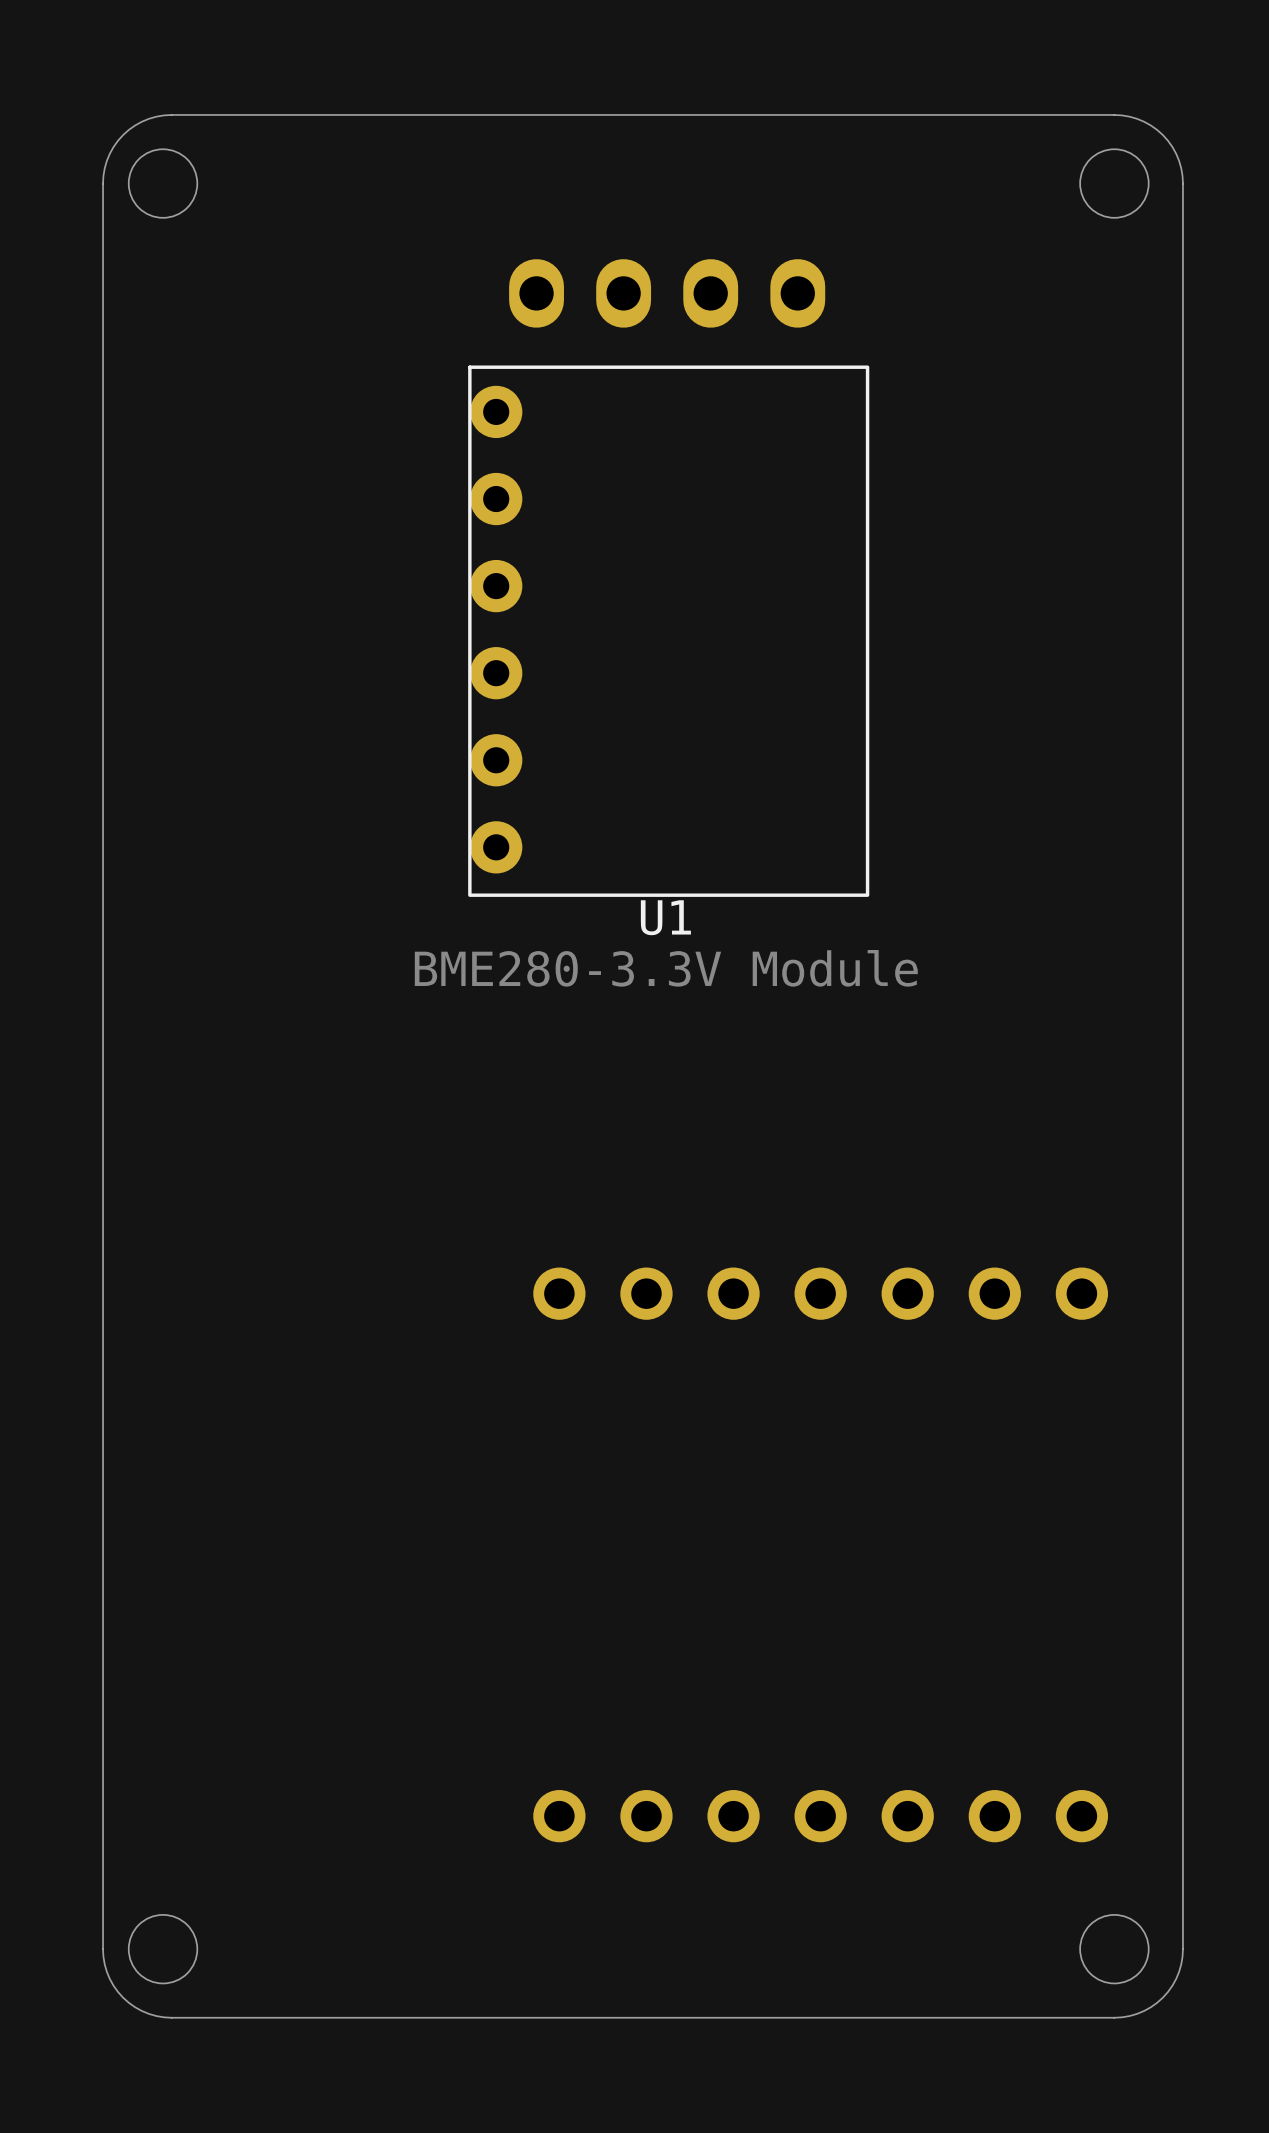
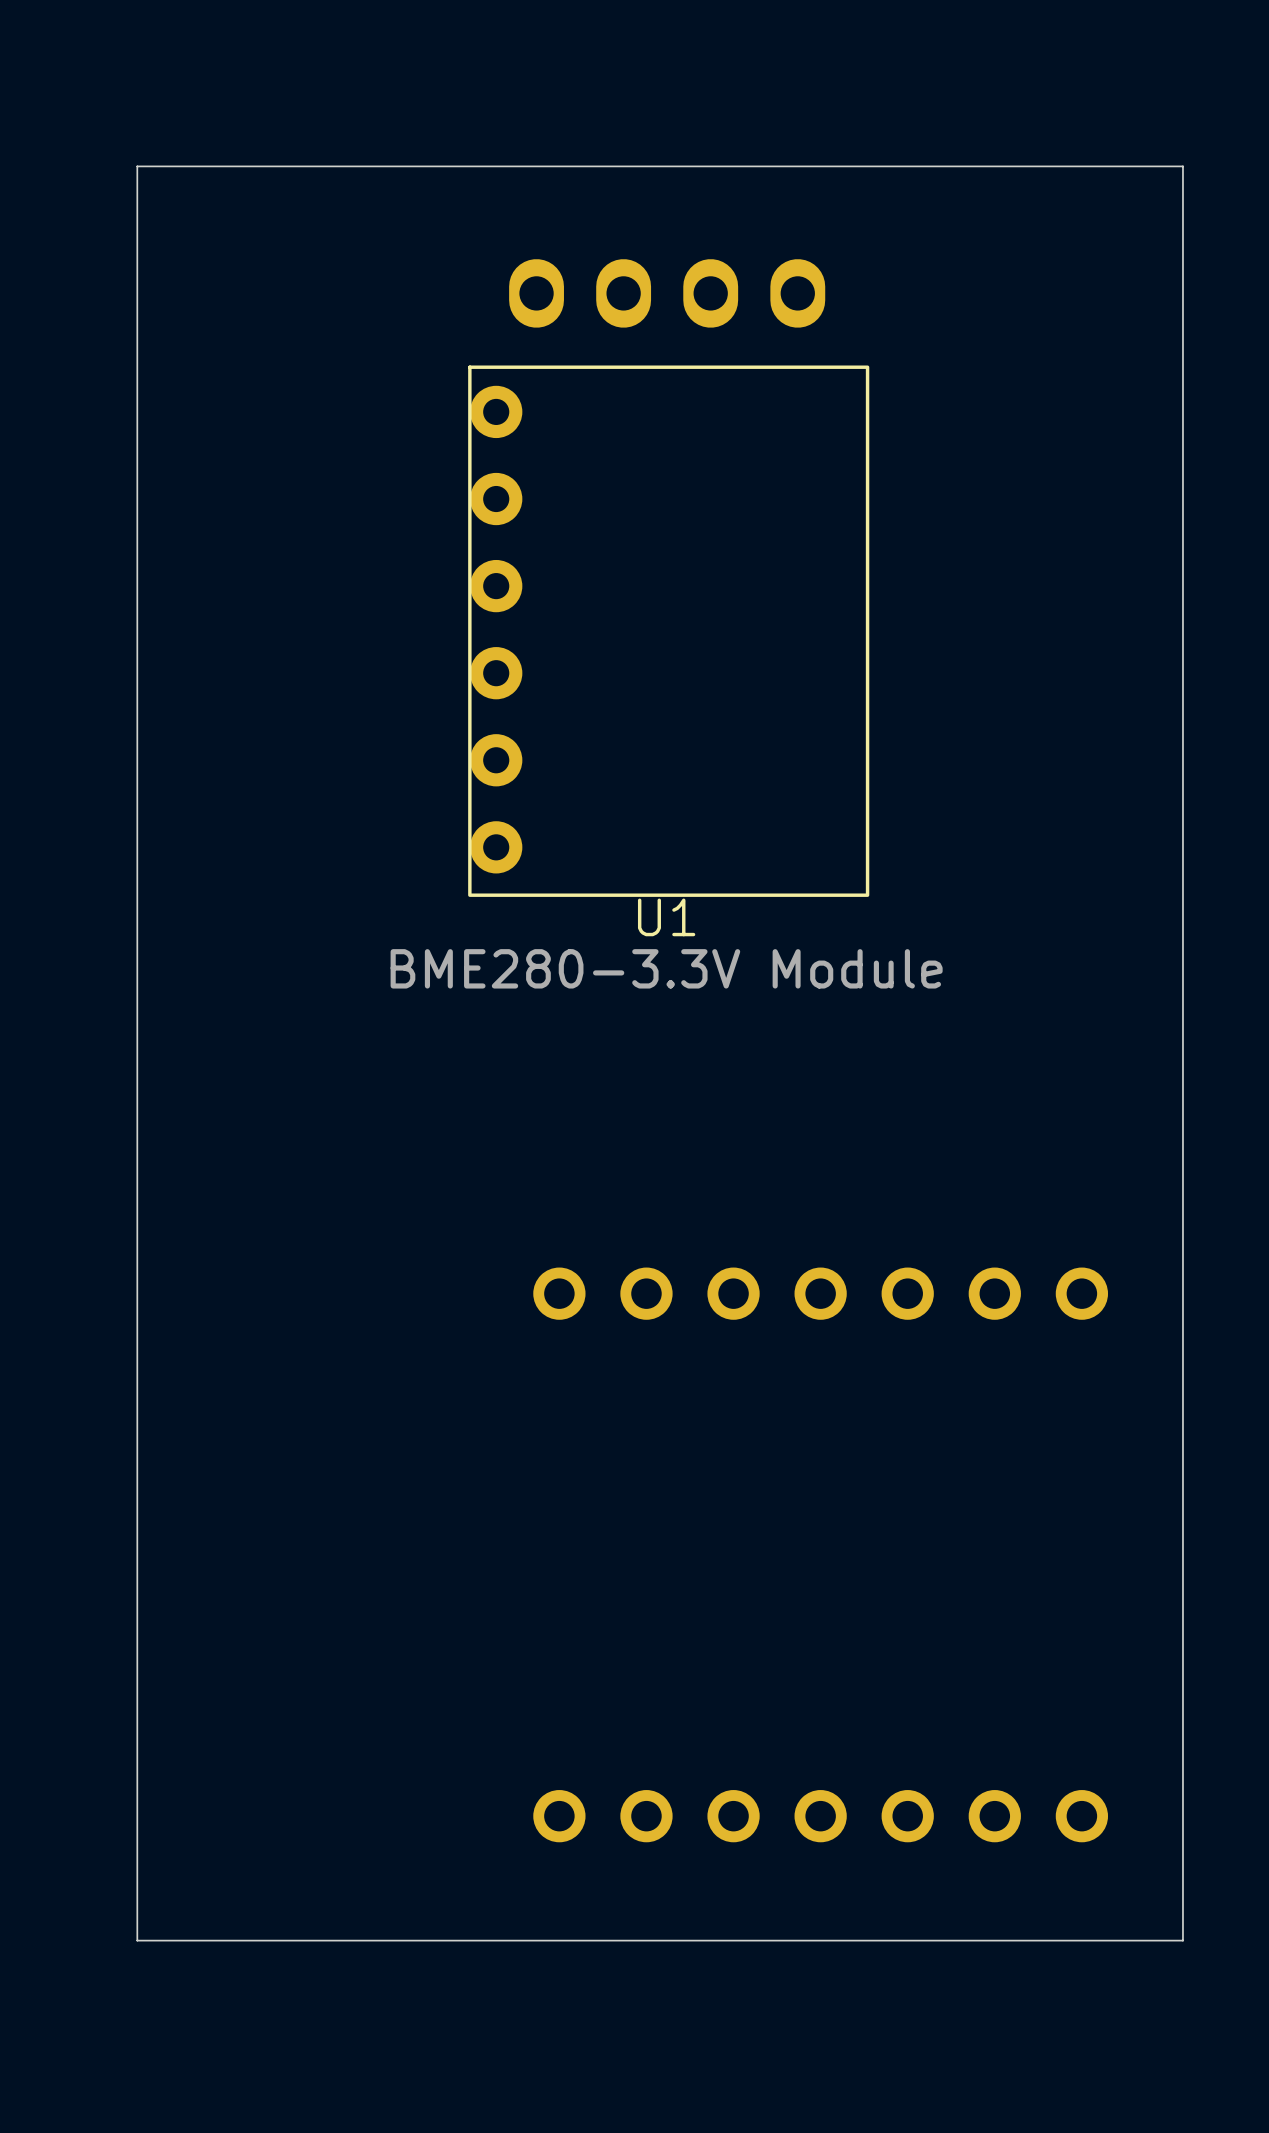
round board edge: [127, 148, 199, 219] -> none
round board edge: [1079, 148, 1150, 219] -> none
board edge: (1182, 183) (1179, 160) (1172, 147) (1162, 135) (1144, 121) (1129, 116) (1114, 114) (171, 114) (156, 116) (141, 121) (123, 135) (113, 147) (104, 168) (103, 183) (103, 1949) (106, 1971) (117, 1991) (135, 2007) (148, 2013) (163, 2017) (1114, 2017) (1129, 2016) (1144, 2010) (1157, 2002) (1168, 1991) (1179, 1971) (1182, 1956) (1182, 1940) -> (1182, 183) (1182, 166) (137, 166) (137, 1940) (1182, 1940)
round board edge: [127, 1914, 199, 1985] -> none
round board edge: [1079, 1914, 1150, 1985] -> none

